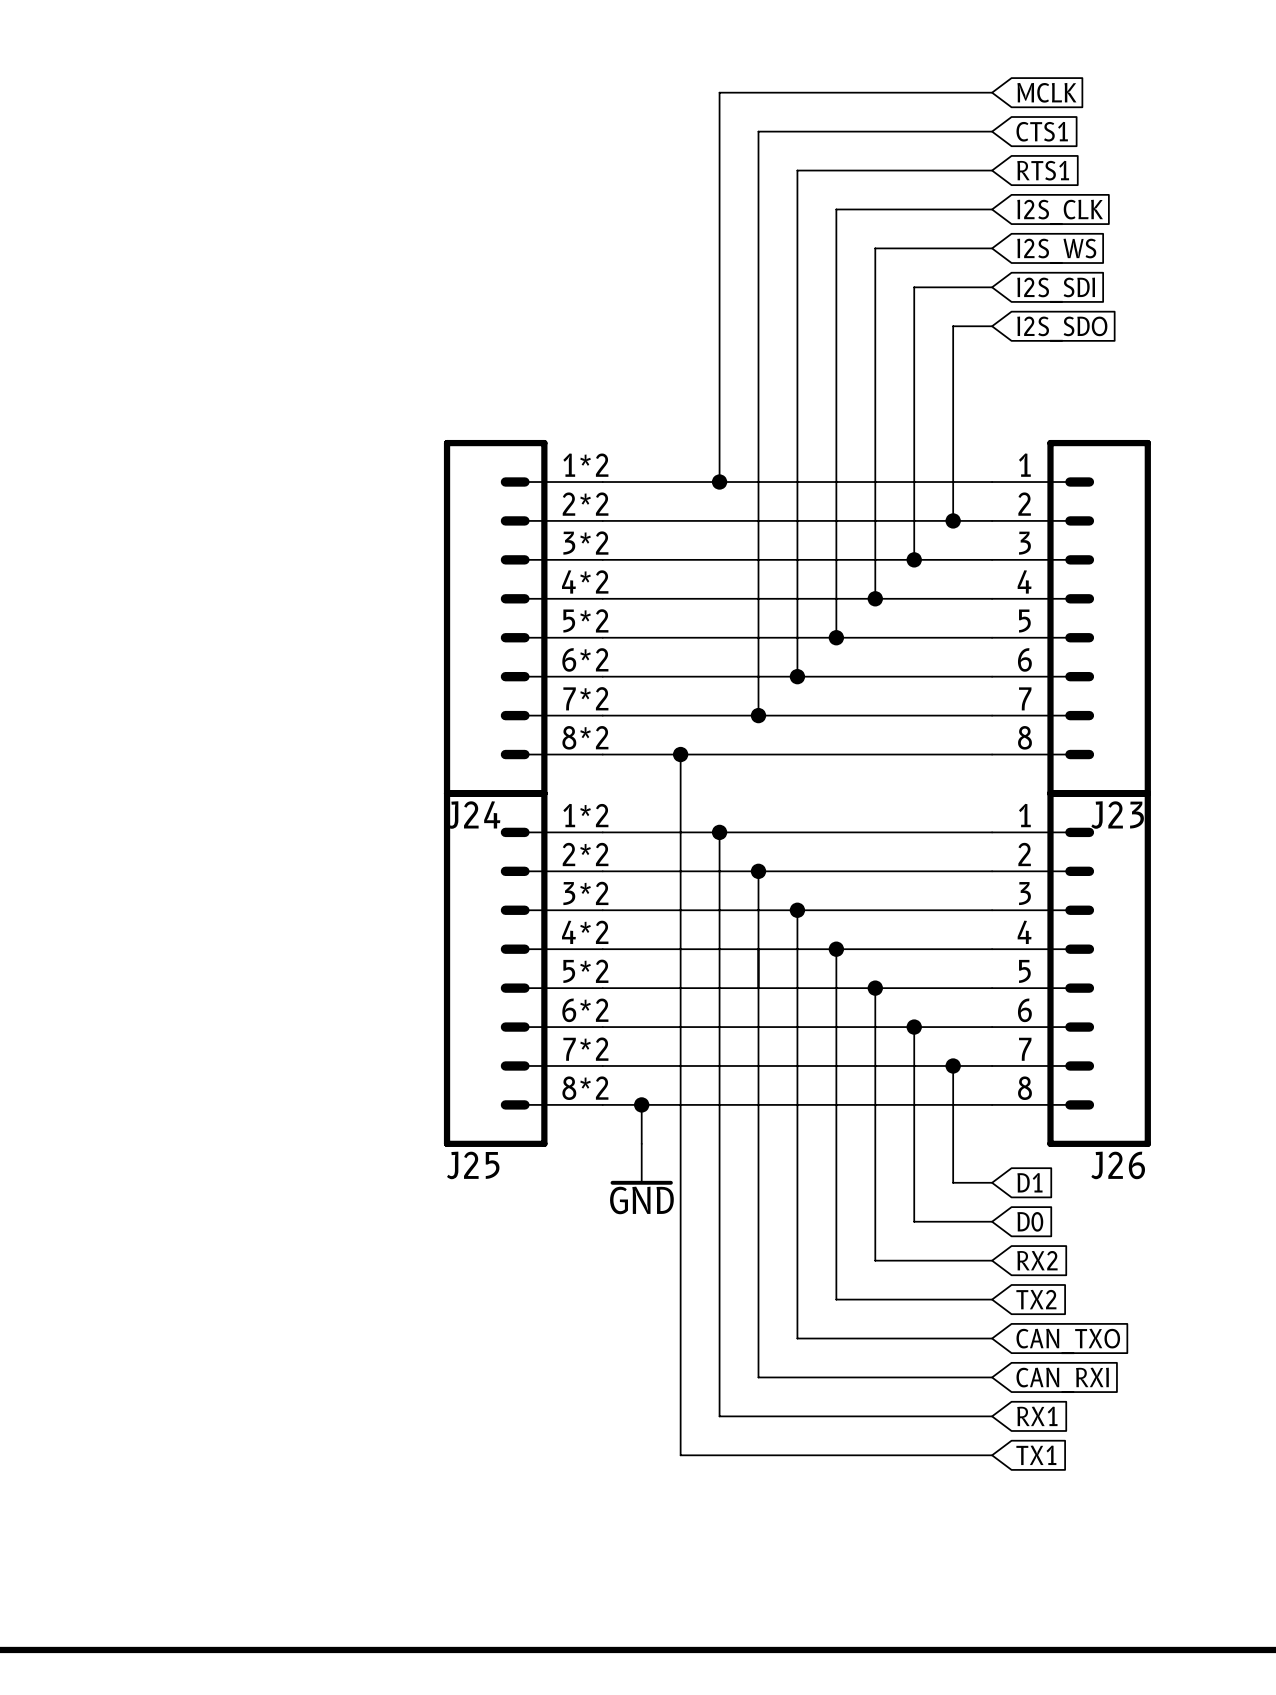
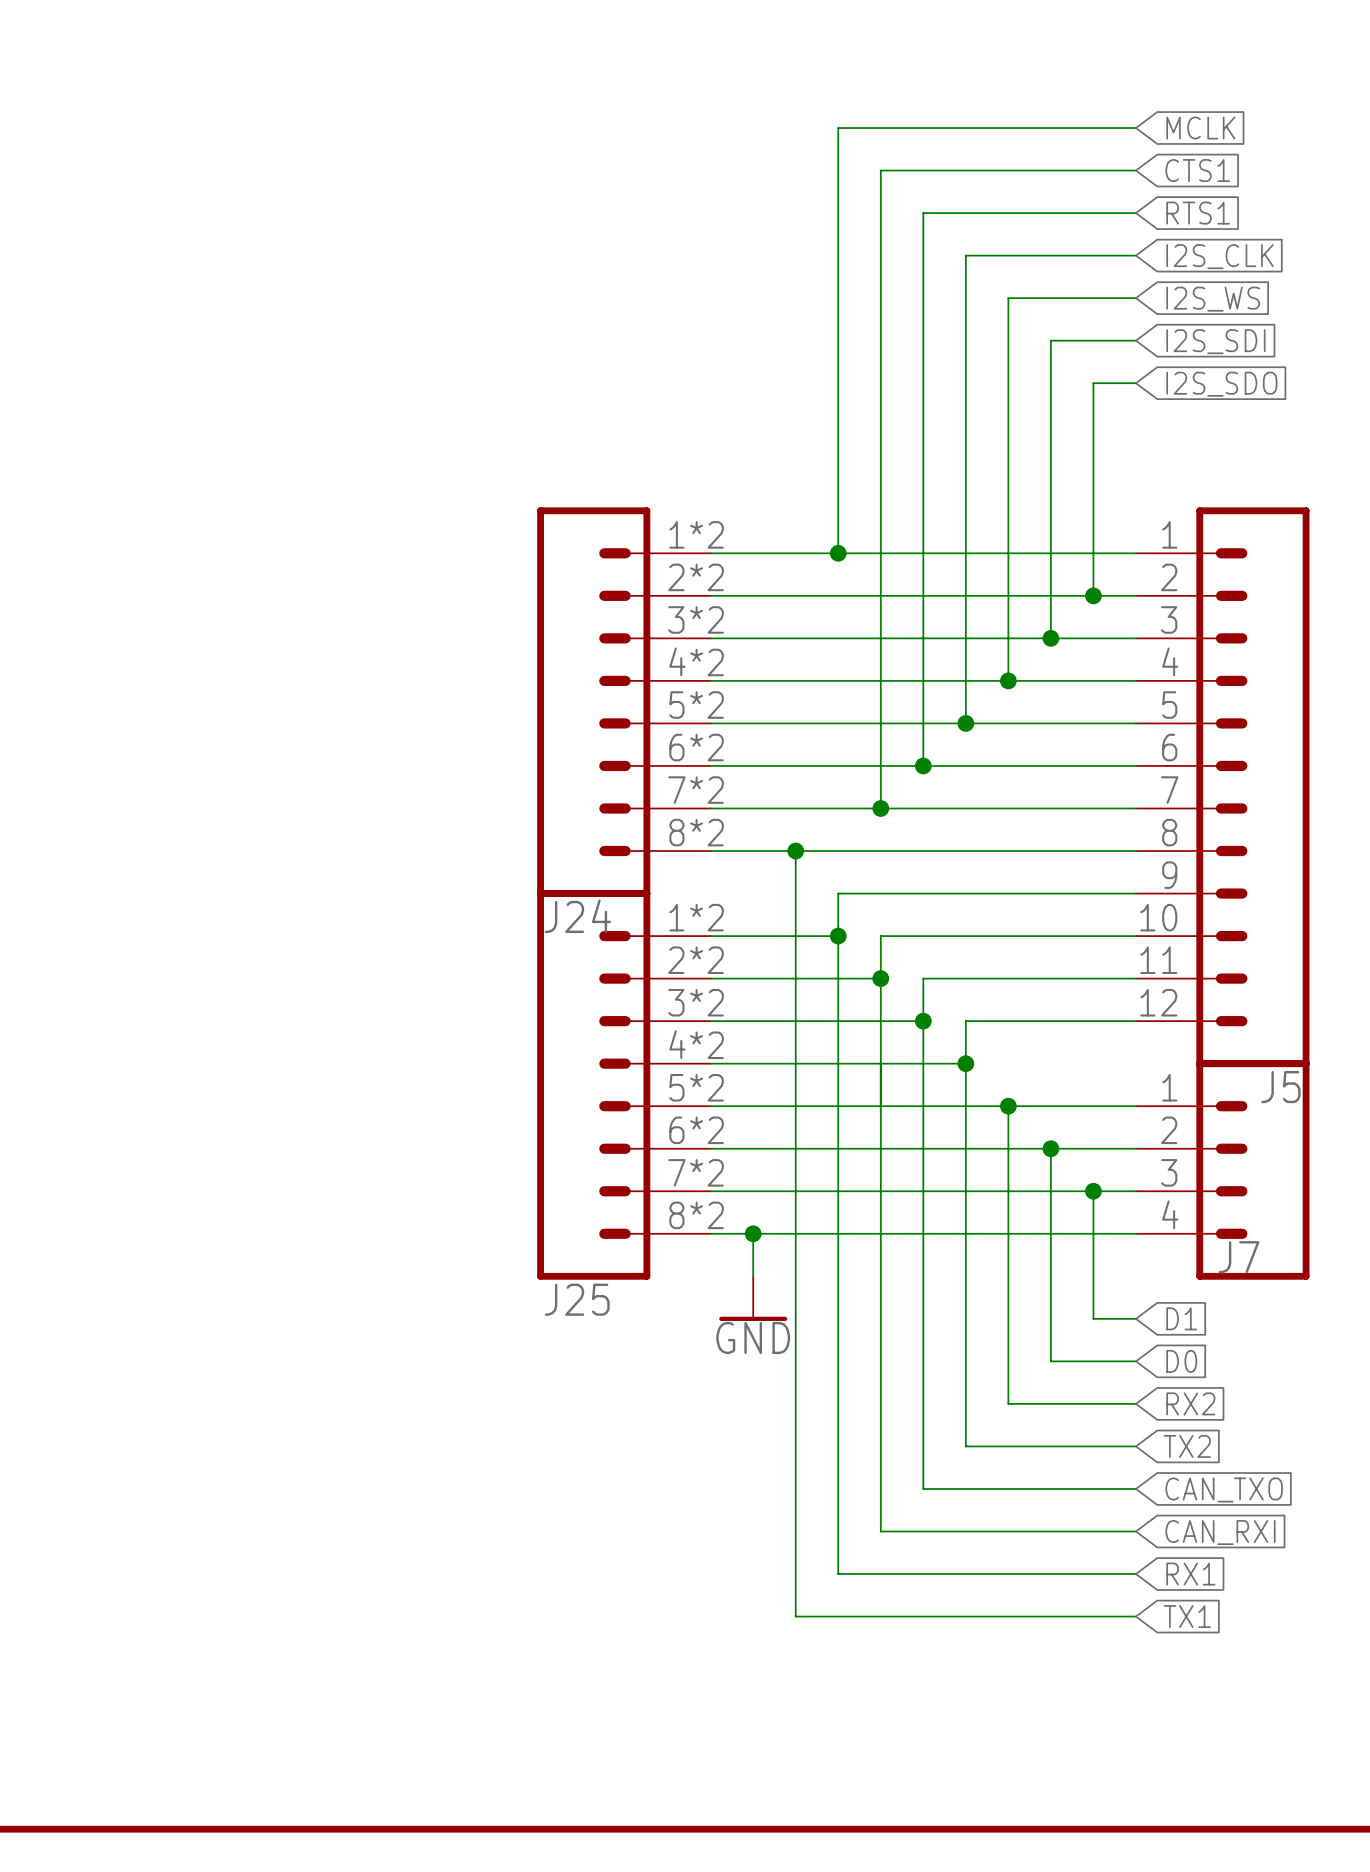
J23: (1071, 618) -> none
J5: none -> (1222, 787)
wire: none -> (1135, 893) (838, 893) (838, 936)
wire: (719, 832) (758, 832) -> (880, 978) (880, 936)
wire: (758, 871) (797, 871) -> (923, 1021) (923, 978)
wire: (797, 910) (836, 910) -> (965, 1063) (965, 1021)
wire: (836, 949) (992, 949) -> none
J26: (1071, 968) -> none
J7: none -> (1222, 1169)

